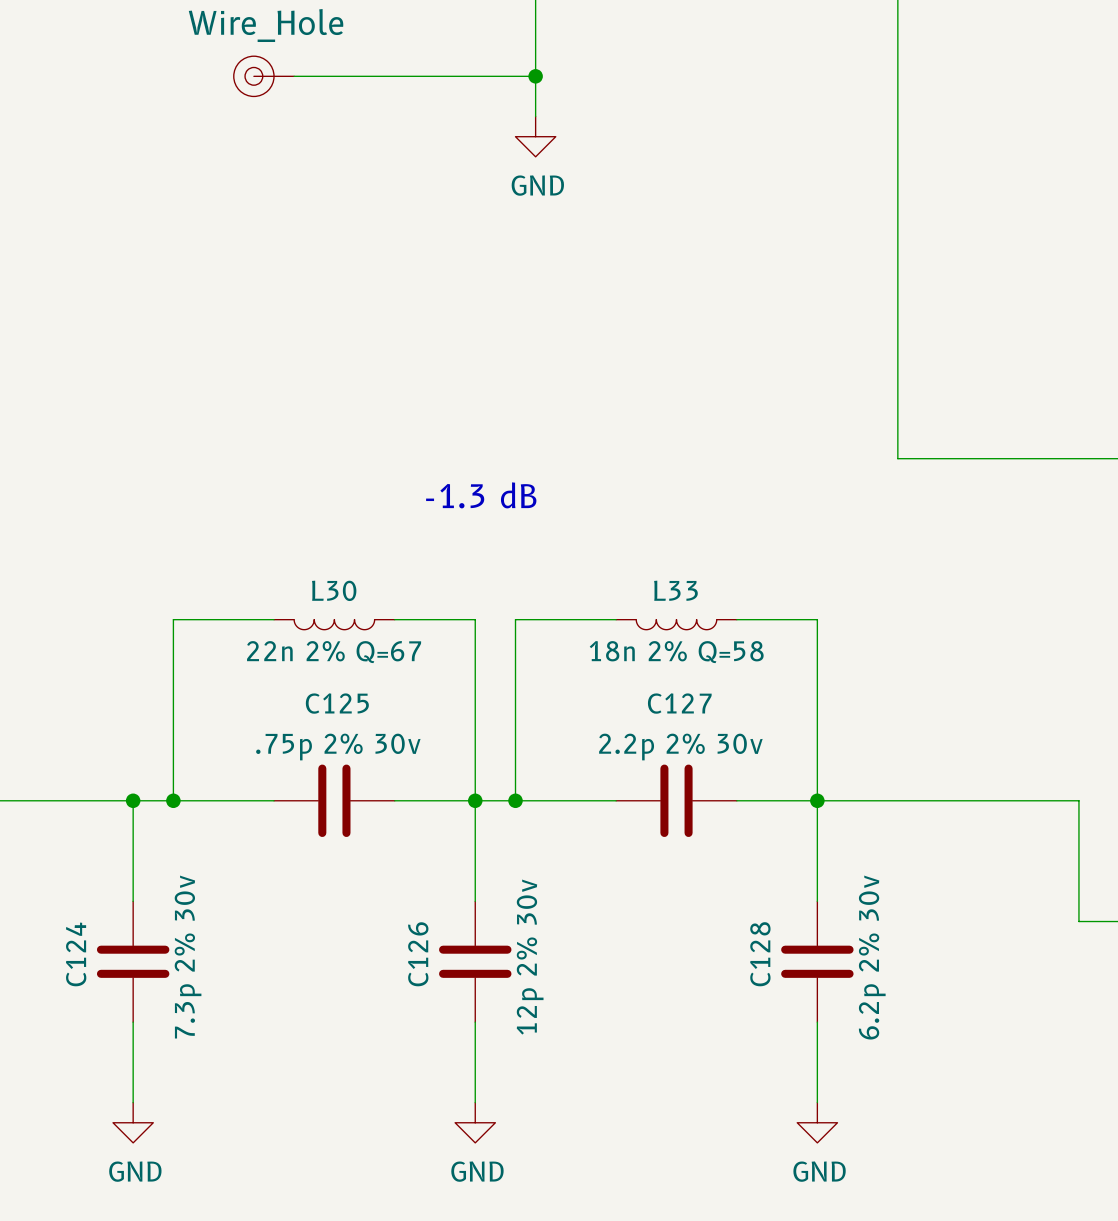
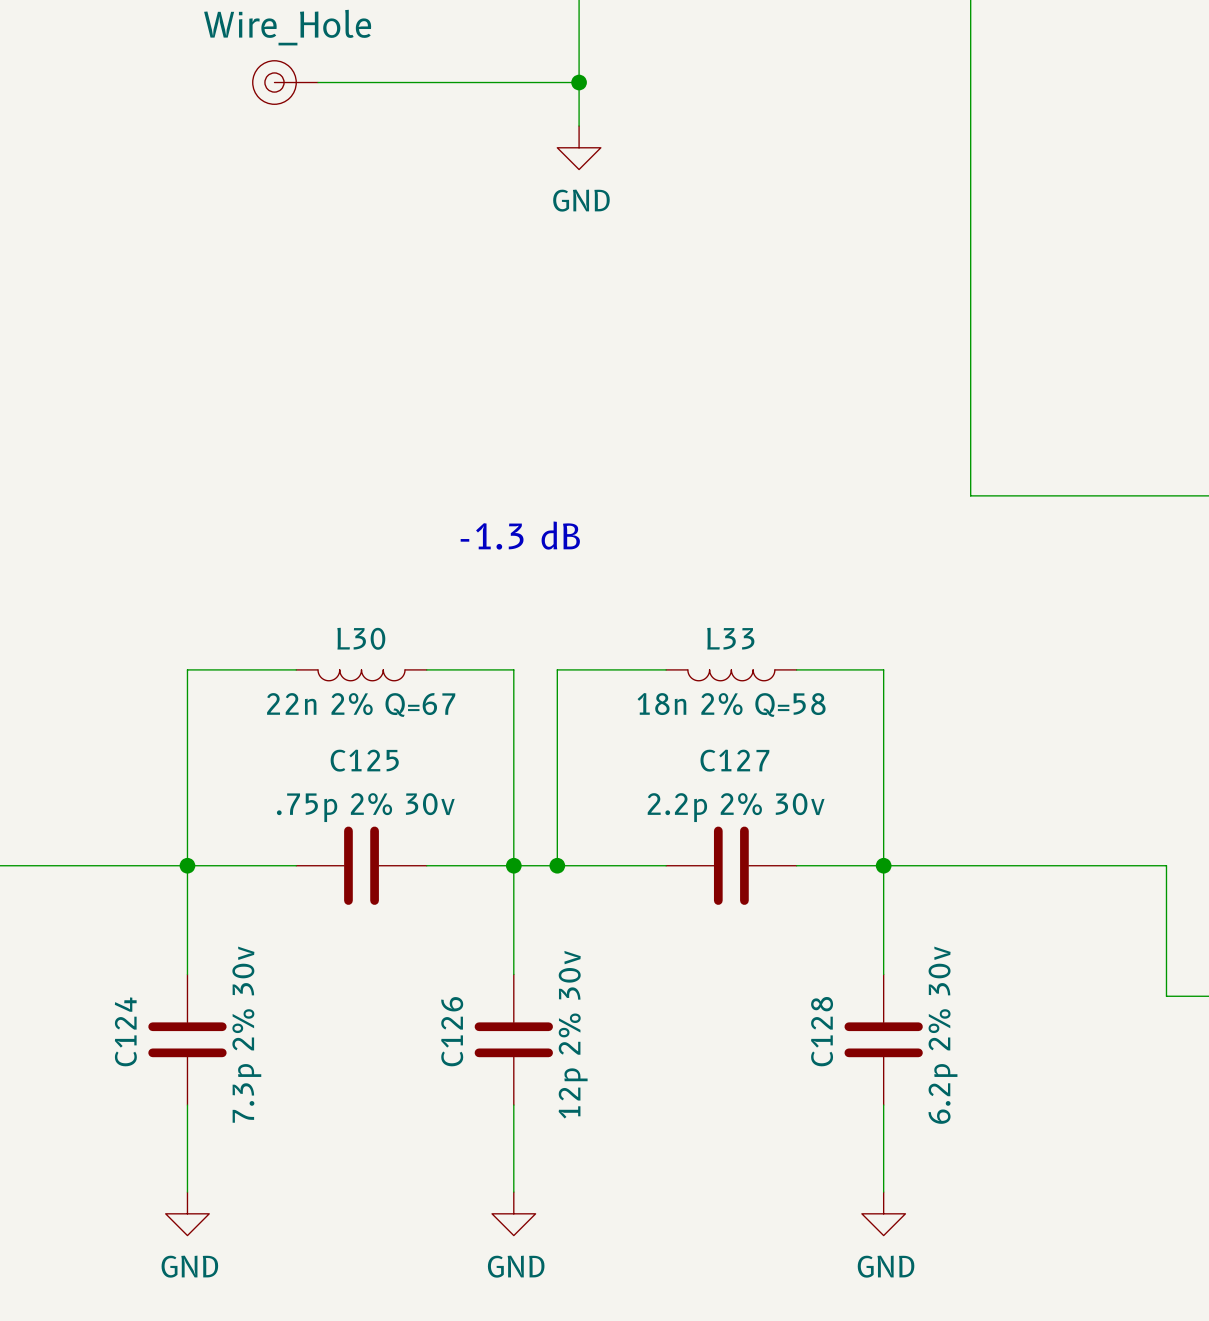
wire: (133, 800) (133, 901) -> (187, 865) (187, 974)
junction: (133, 800) -> none
C124 position: (133, 961) -> (187, 1039)
wire: (133, 1022) (133, 1102) -> (187, 1105) (187, 1192)
power symbol position: GND (133, 1122) -> GND (187, 1213)

